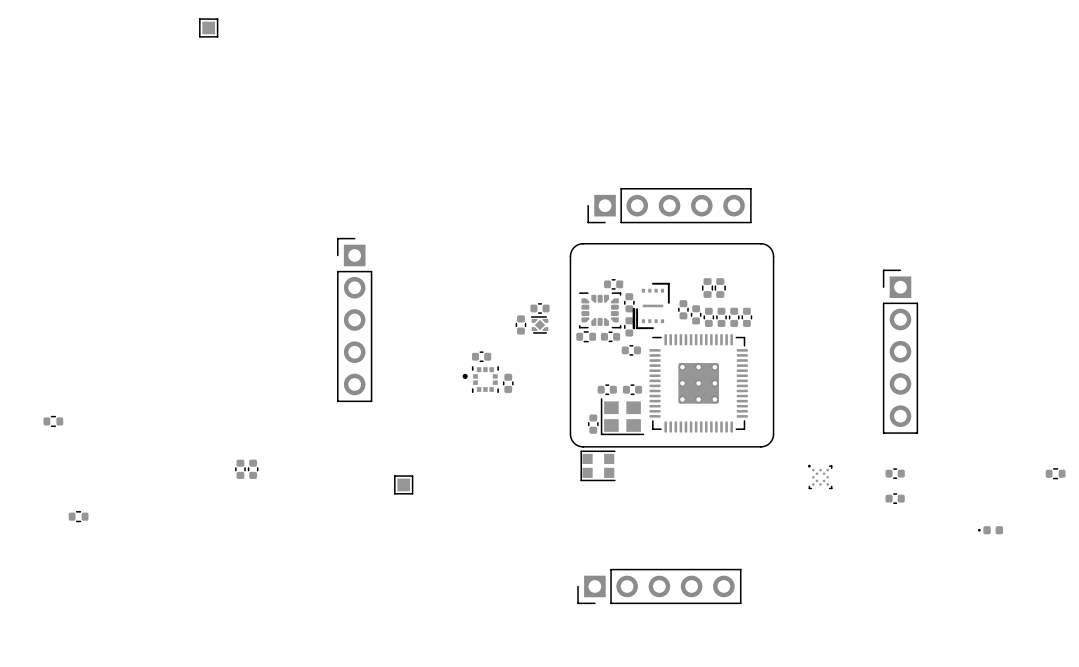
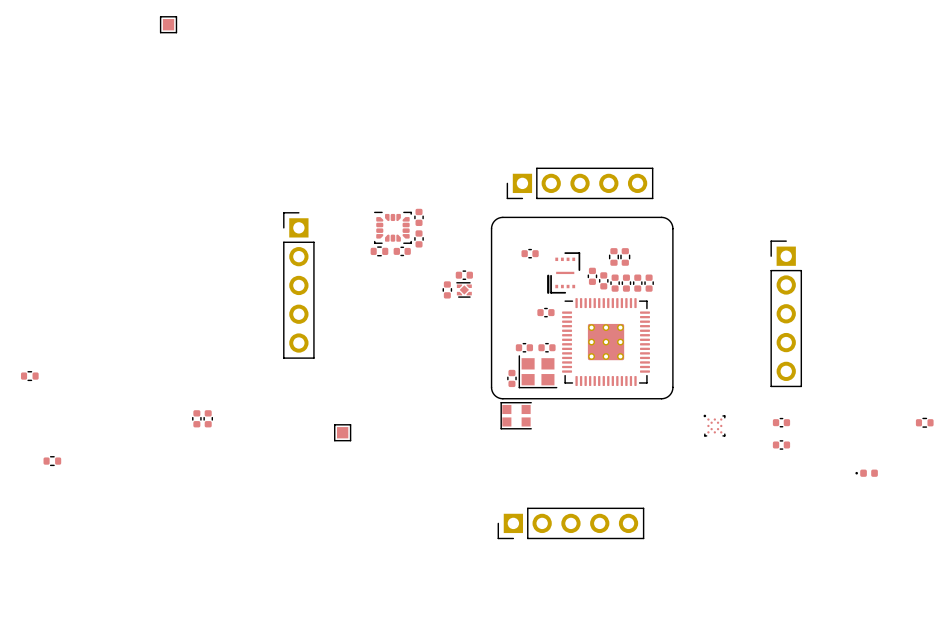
part: none -> (419, 217)
part: none -> (419, 238)
part: none -> (402, 251)
part: (629, 302) -> none
part position: (600, 310) -> (392, 227)
part: (629, 326) -> none
part position: (586, 336) -> (379, 251)
part: (610, 336) -> none
part: (481, 356) -> none
part: (480, 379) -> none
part: (508, 383) -> none

